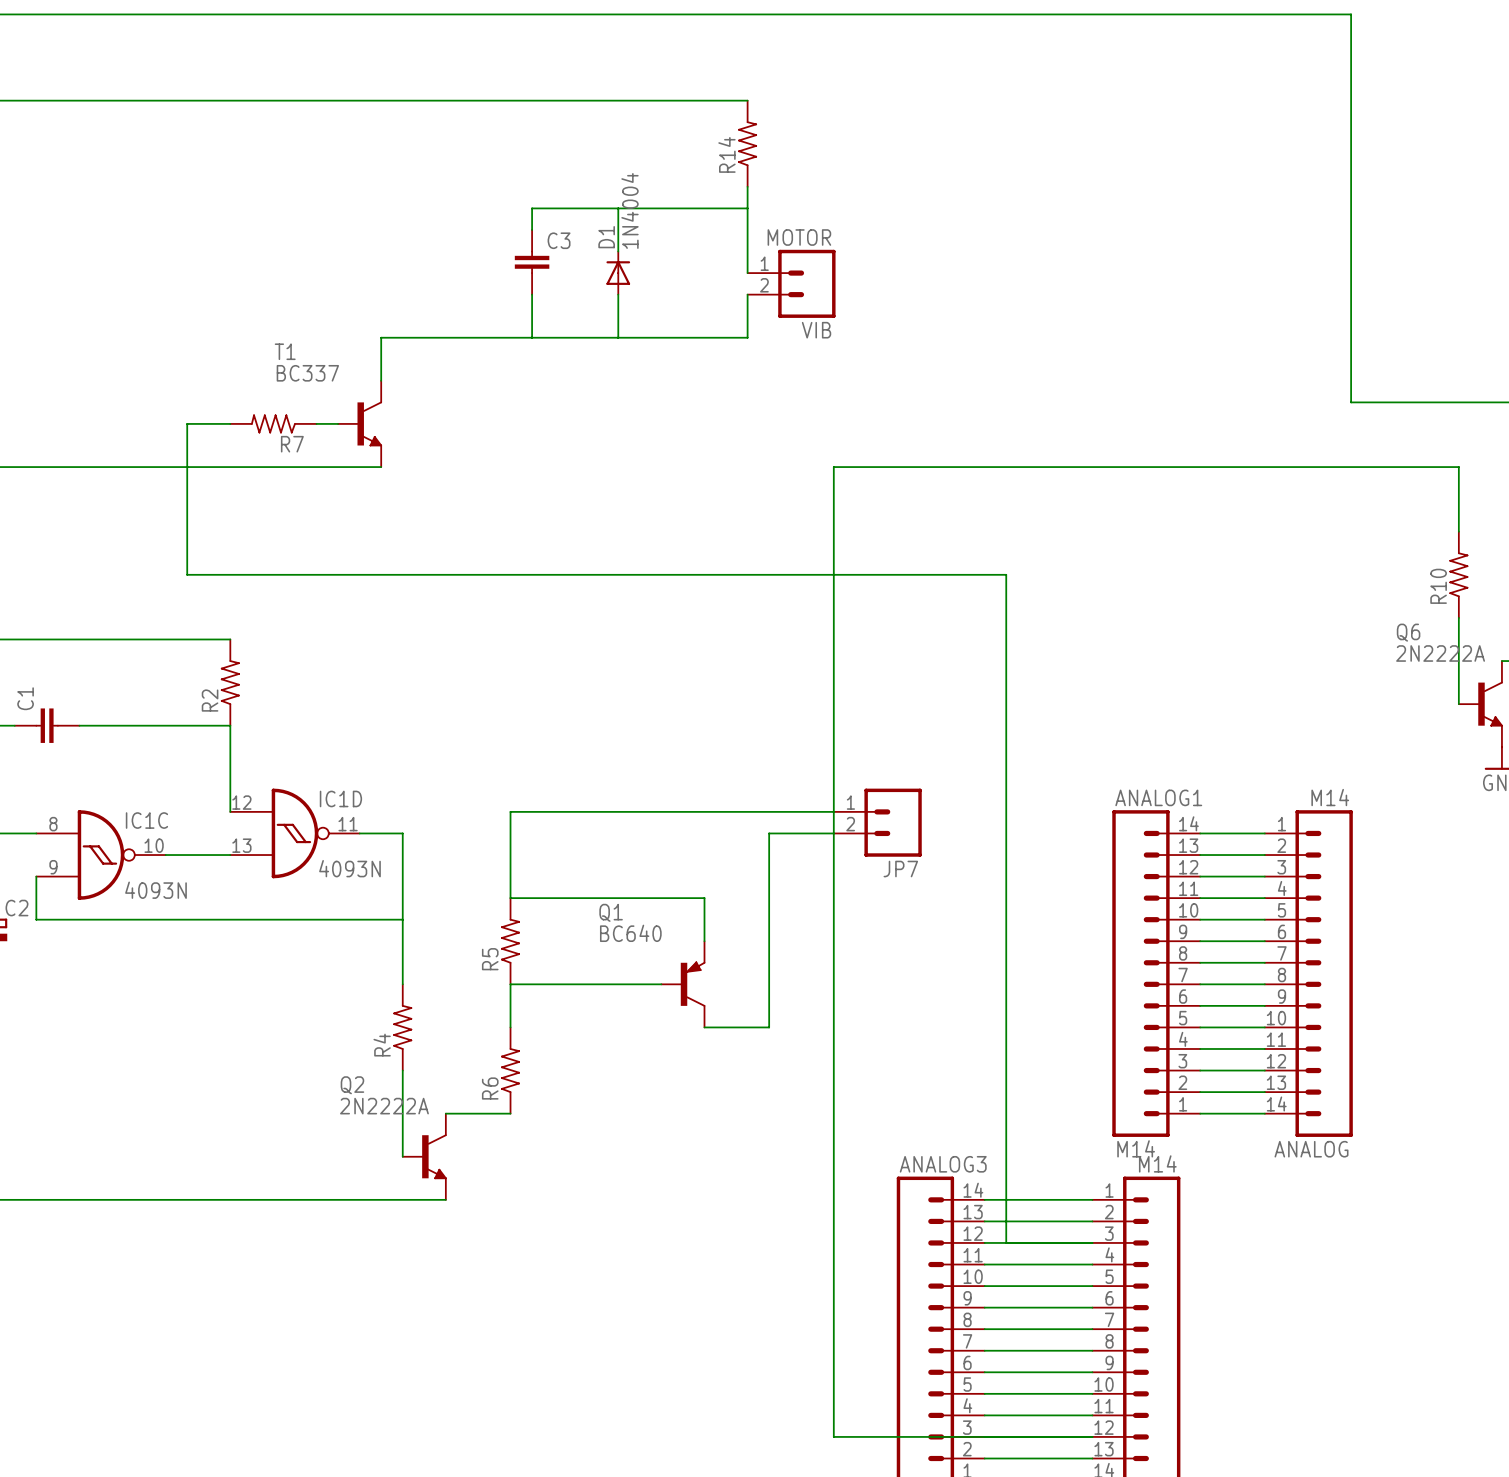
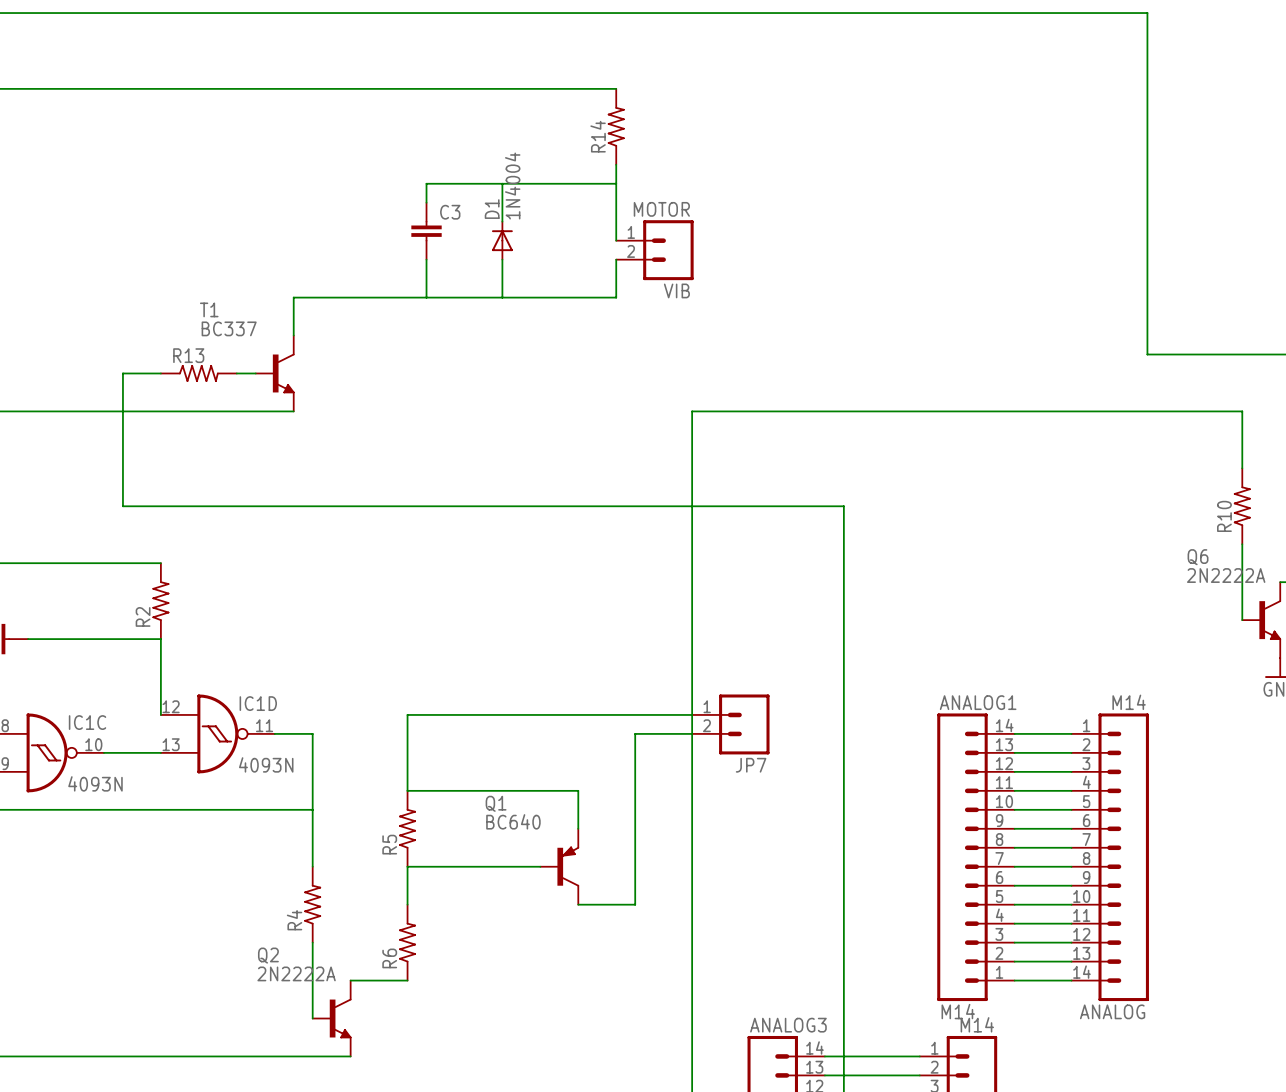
R7: (273, 423) -> none
R13: none -> (198, 373)

